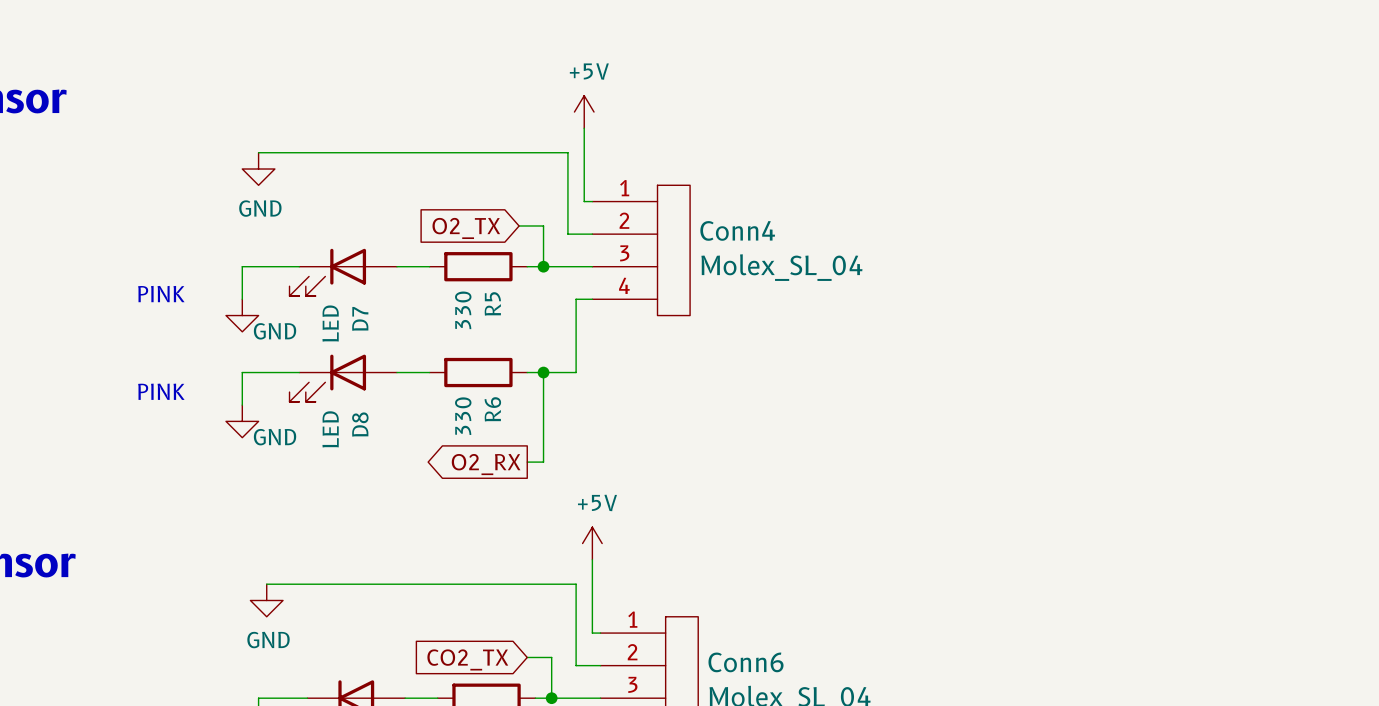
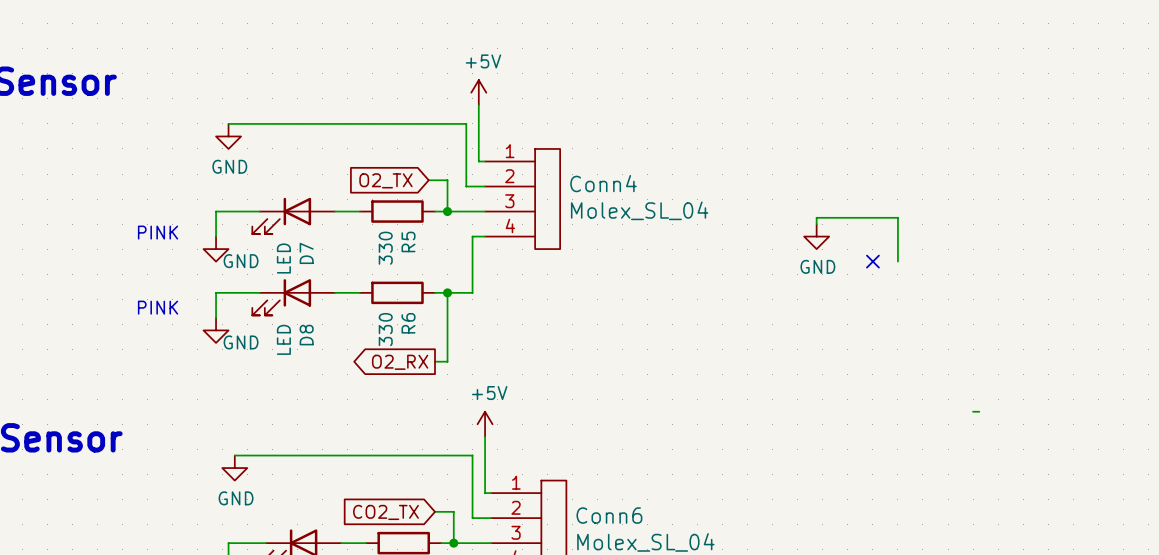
wire: none -> (816, 224) (816, 217) (897, 217) (897, 261)
power symbol: none -> GND (816, 236)
no-connect mark: none -> (872, 261)
wire: none -> (973, 411) (979, 411)

